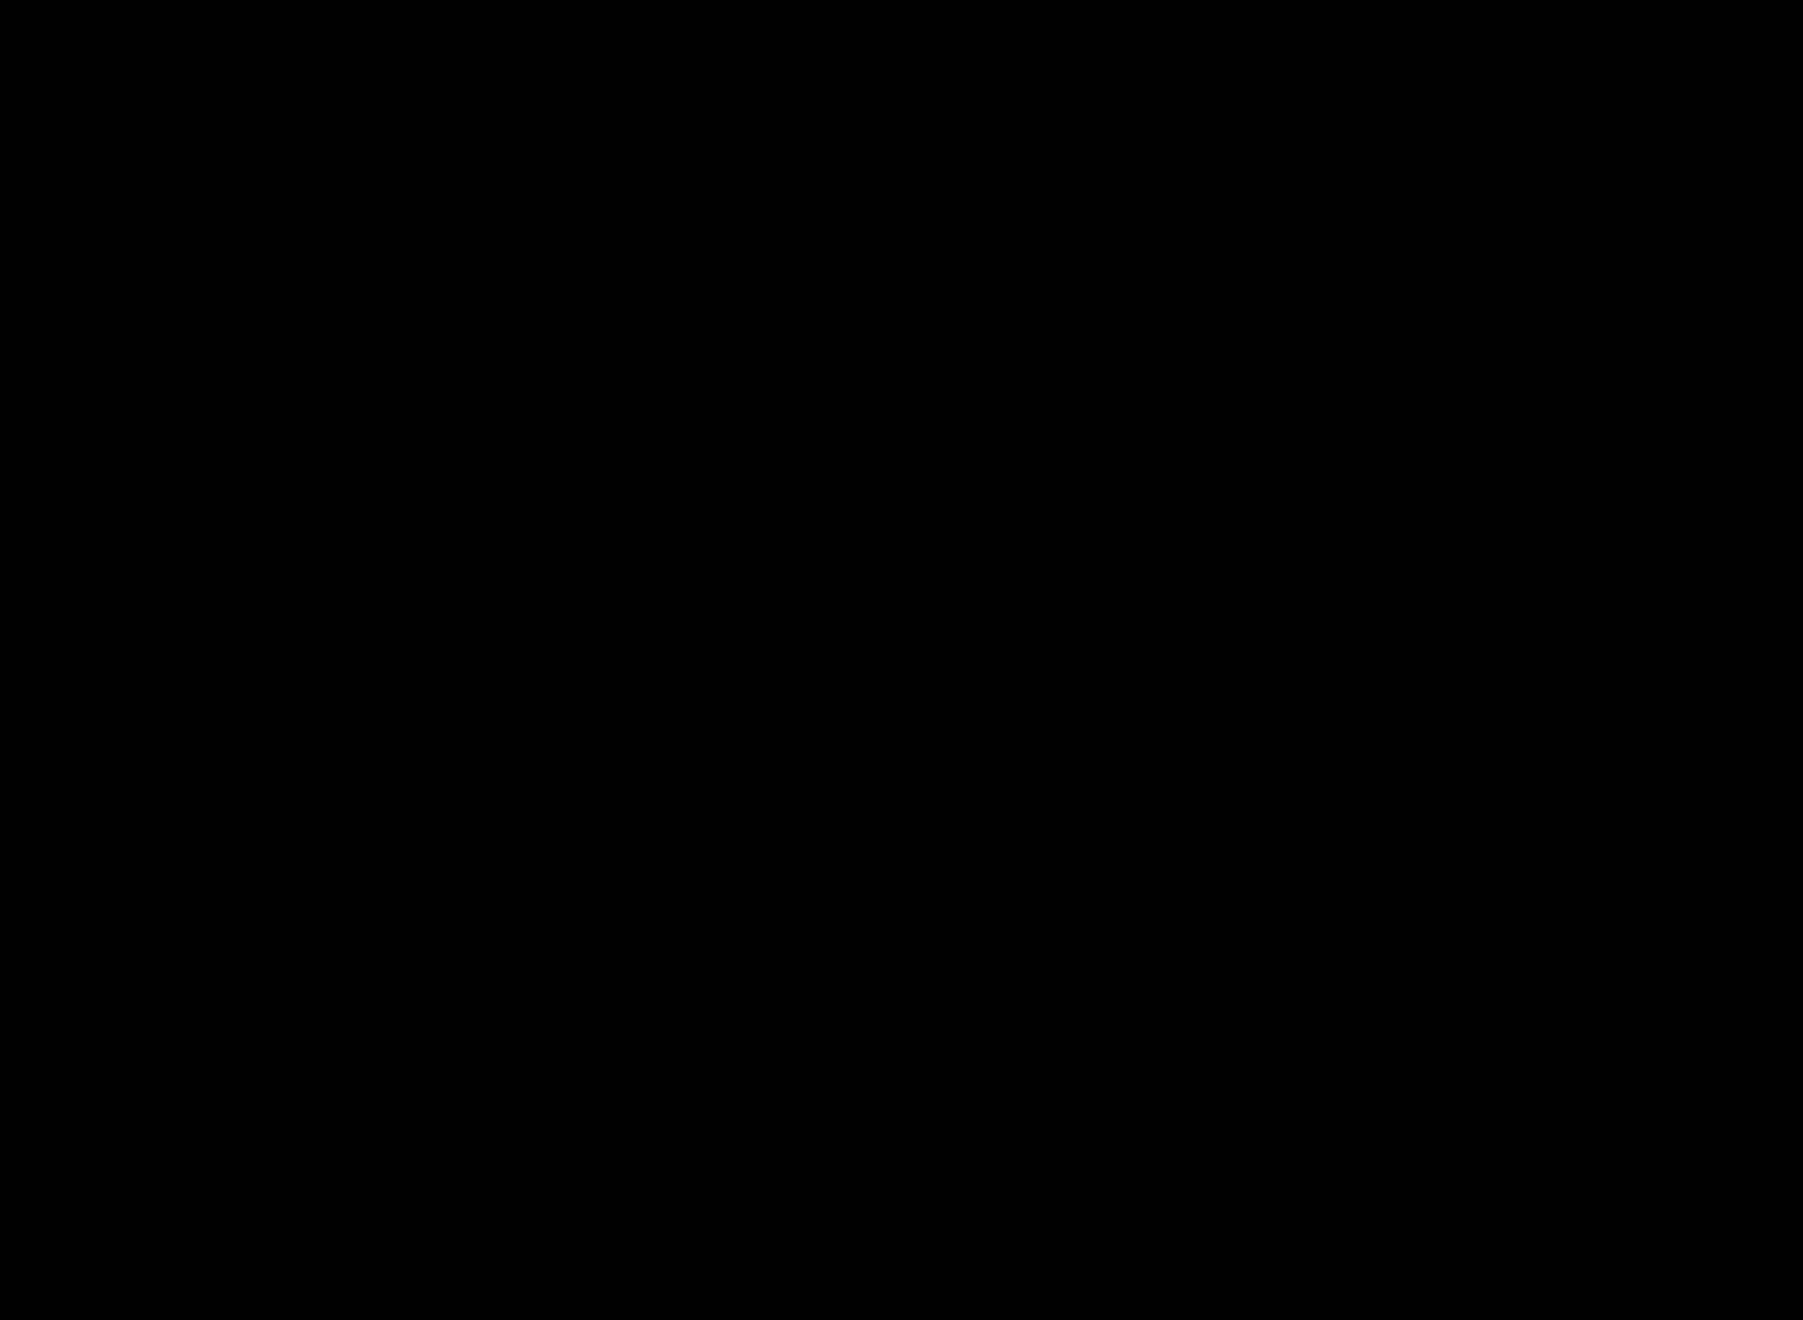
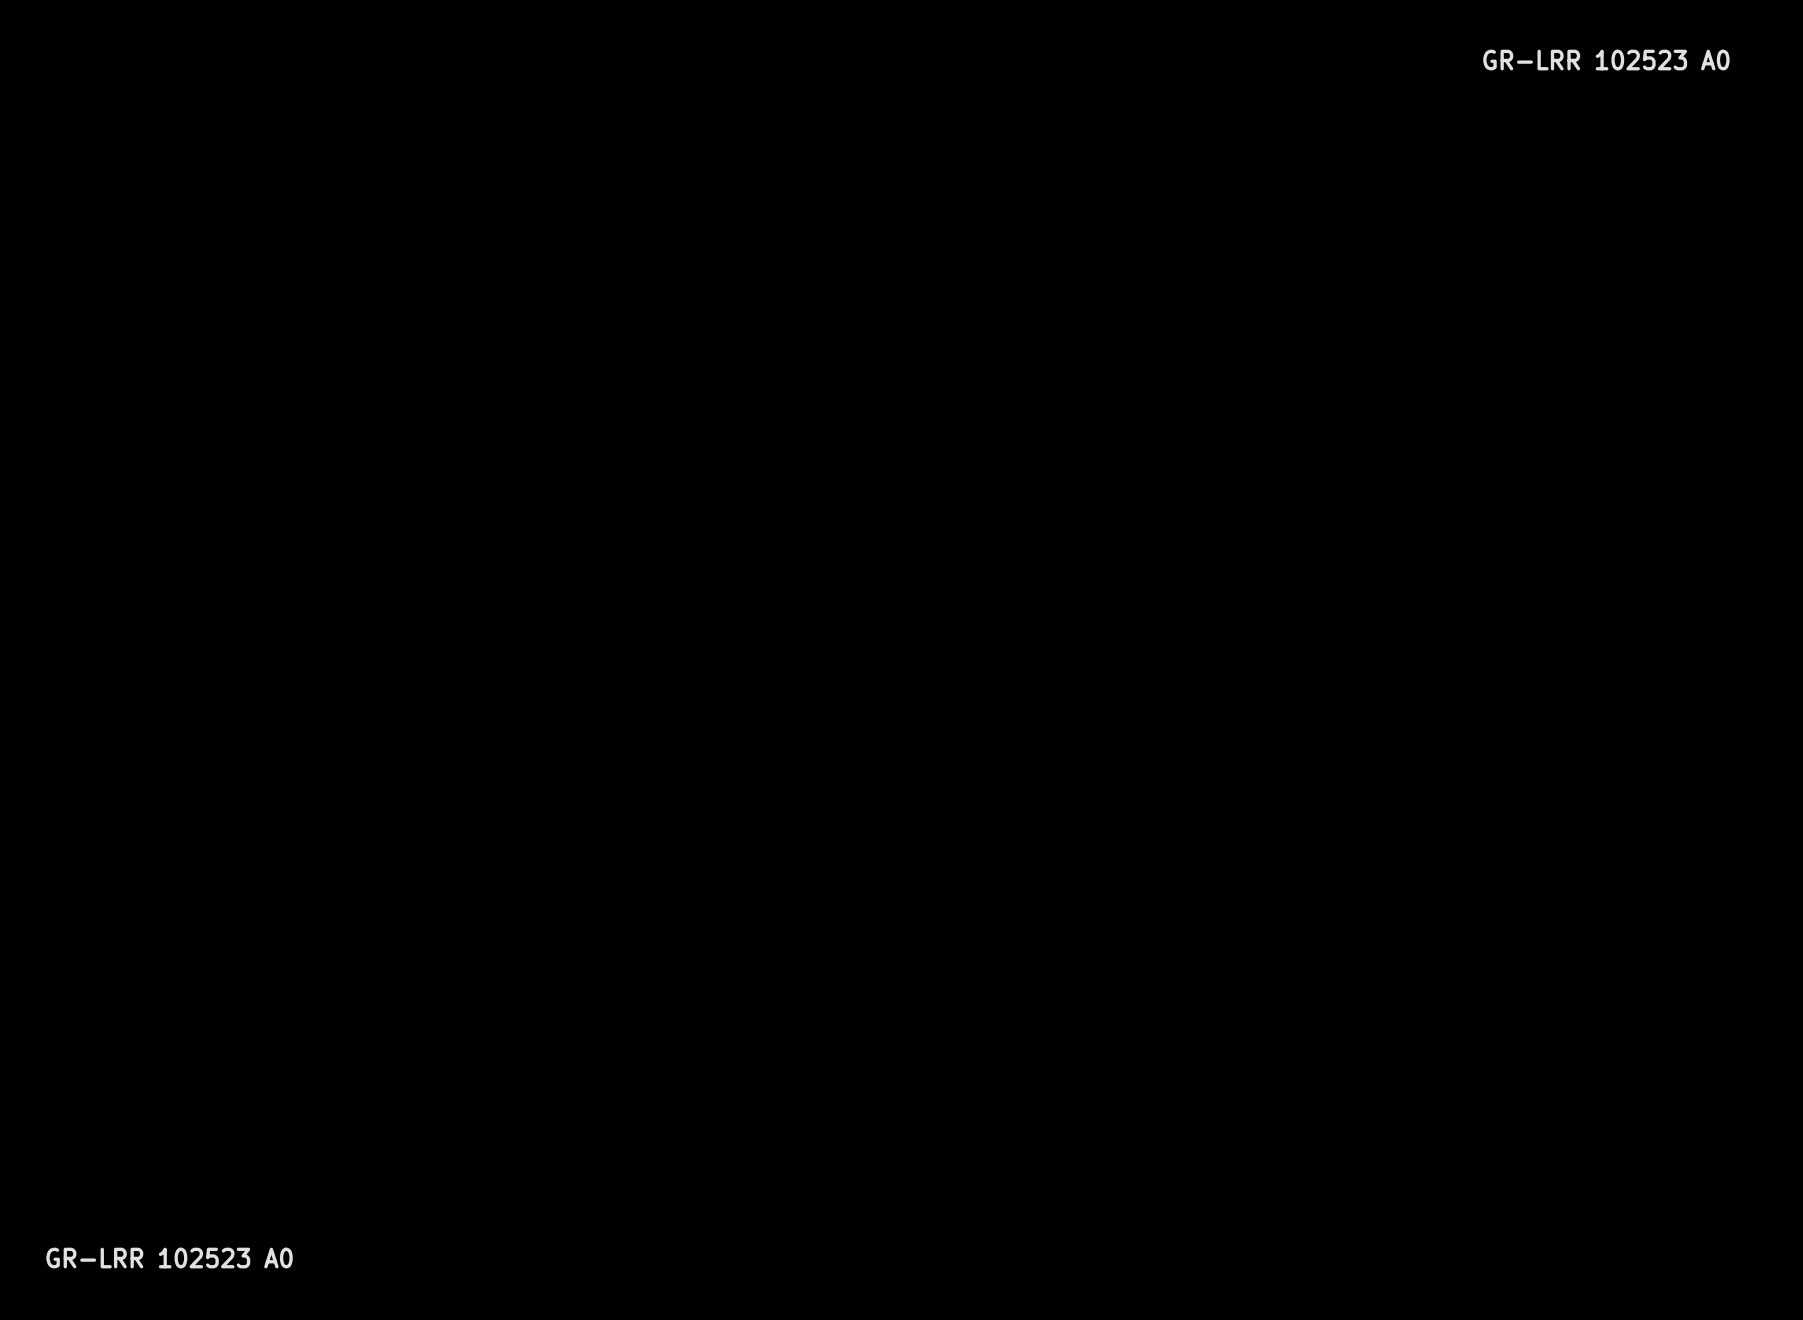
text: none -> GR-LRR 102523 A0 (1606, 60)
text: none -> GR-LRR 102523 A0 (169, 1258)

